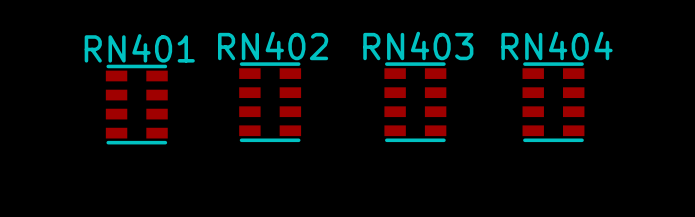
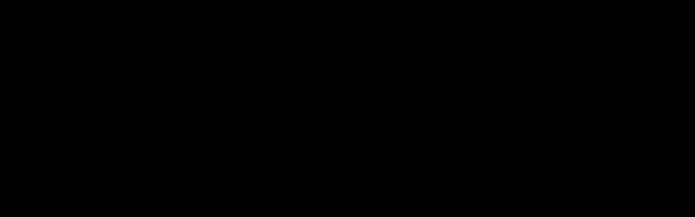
RN402: (270, 102) -> none
RN403: (415, 102) -> none
RN404: (553, 102) -> none
RN401: (136, 104) -> none

